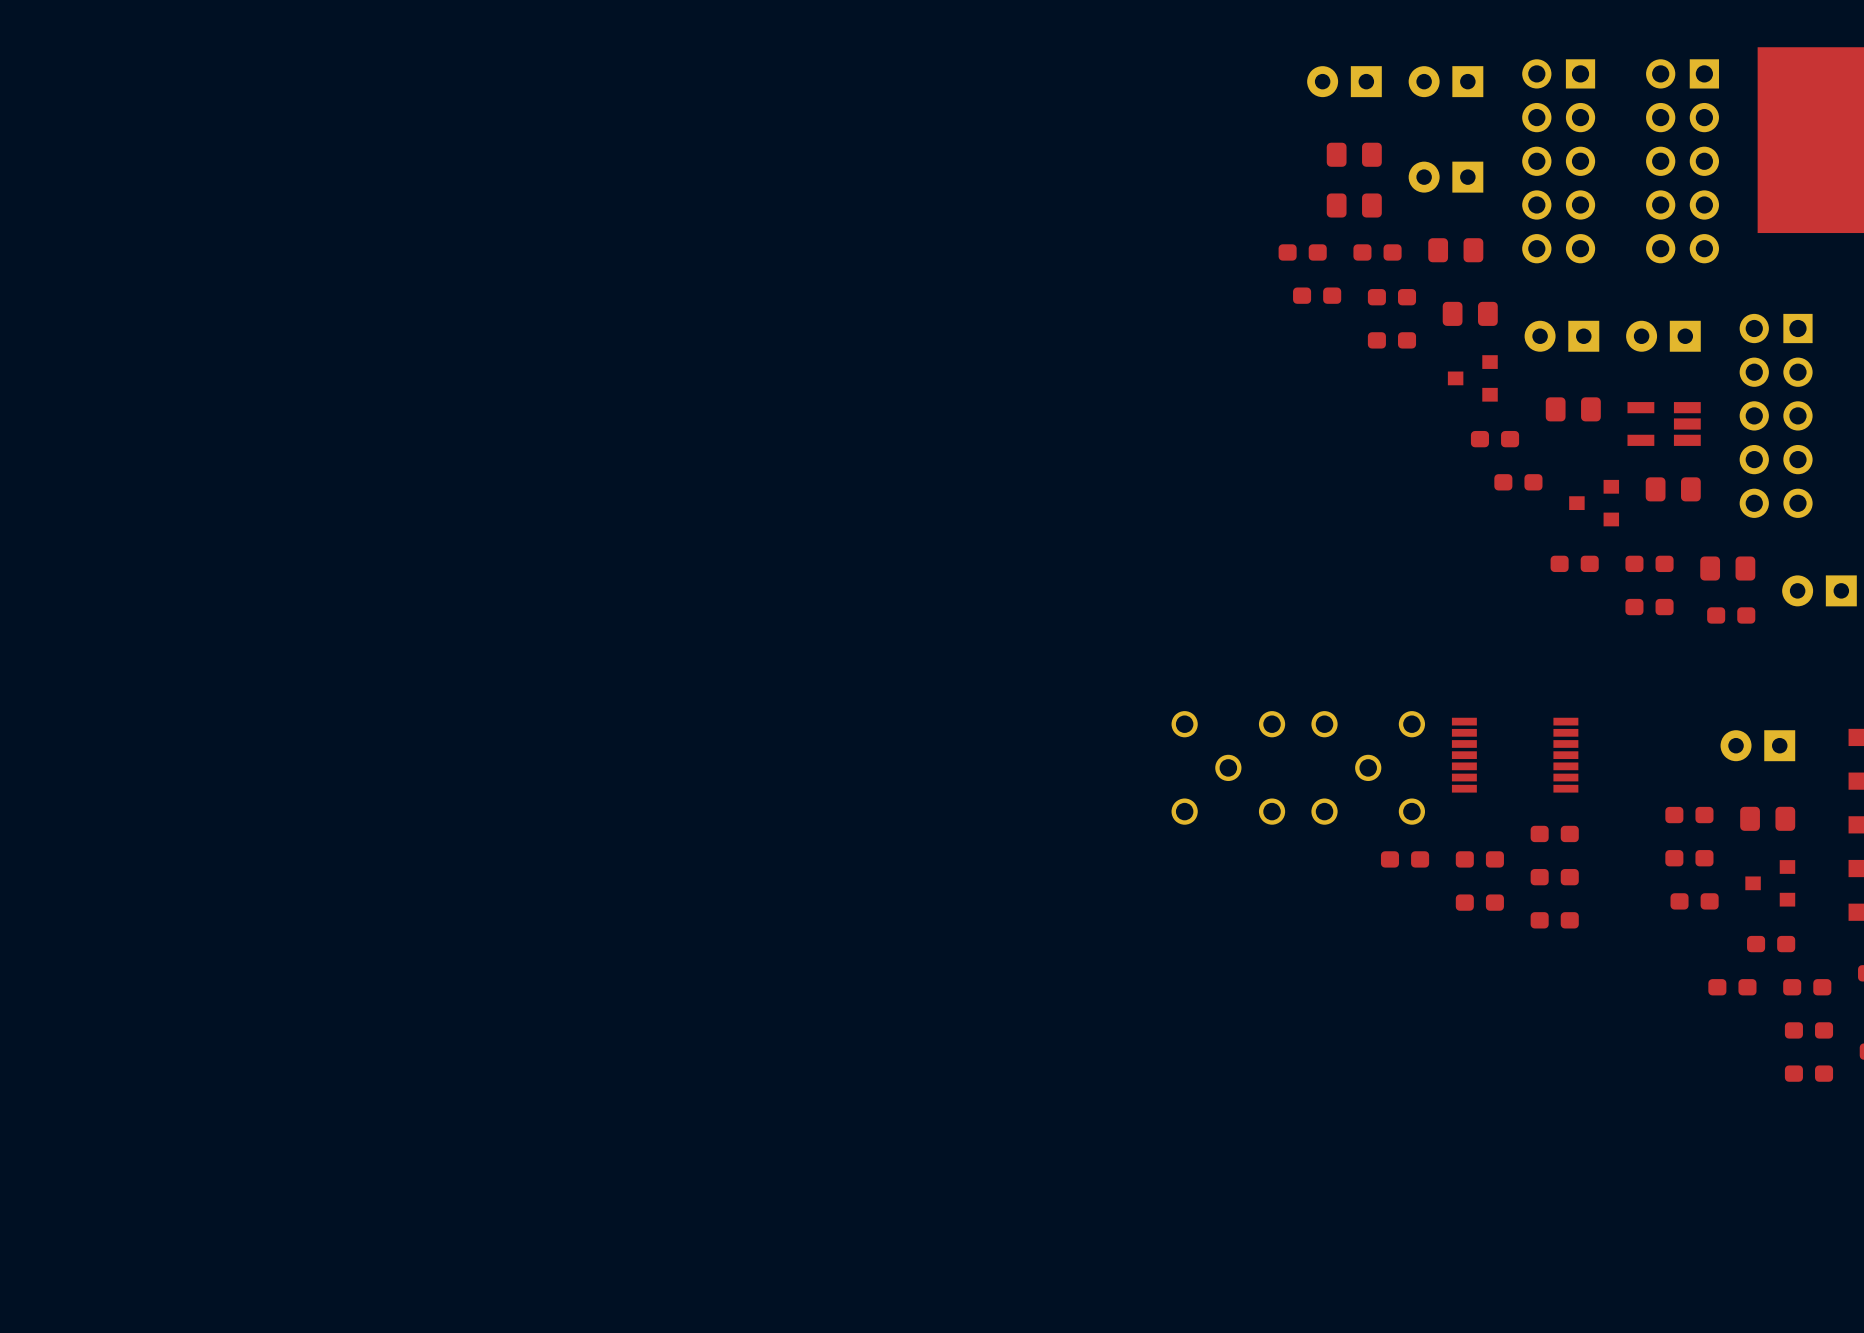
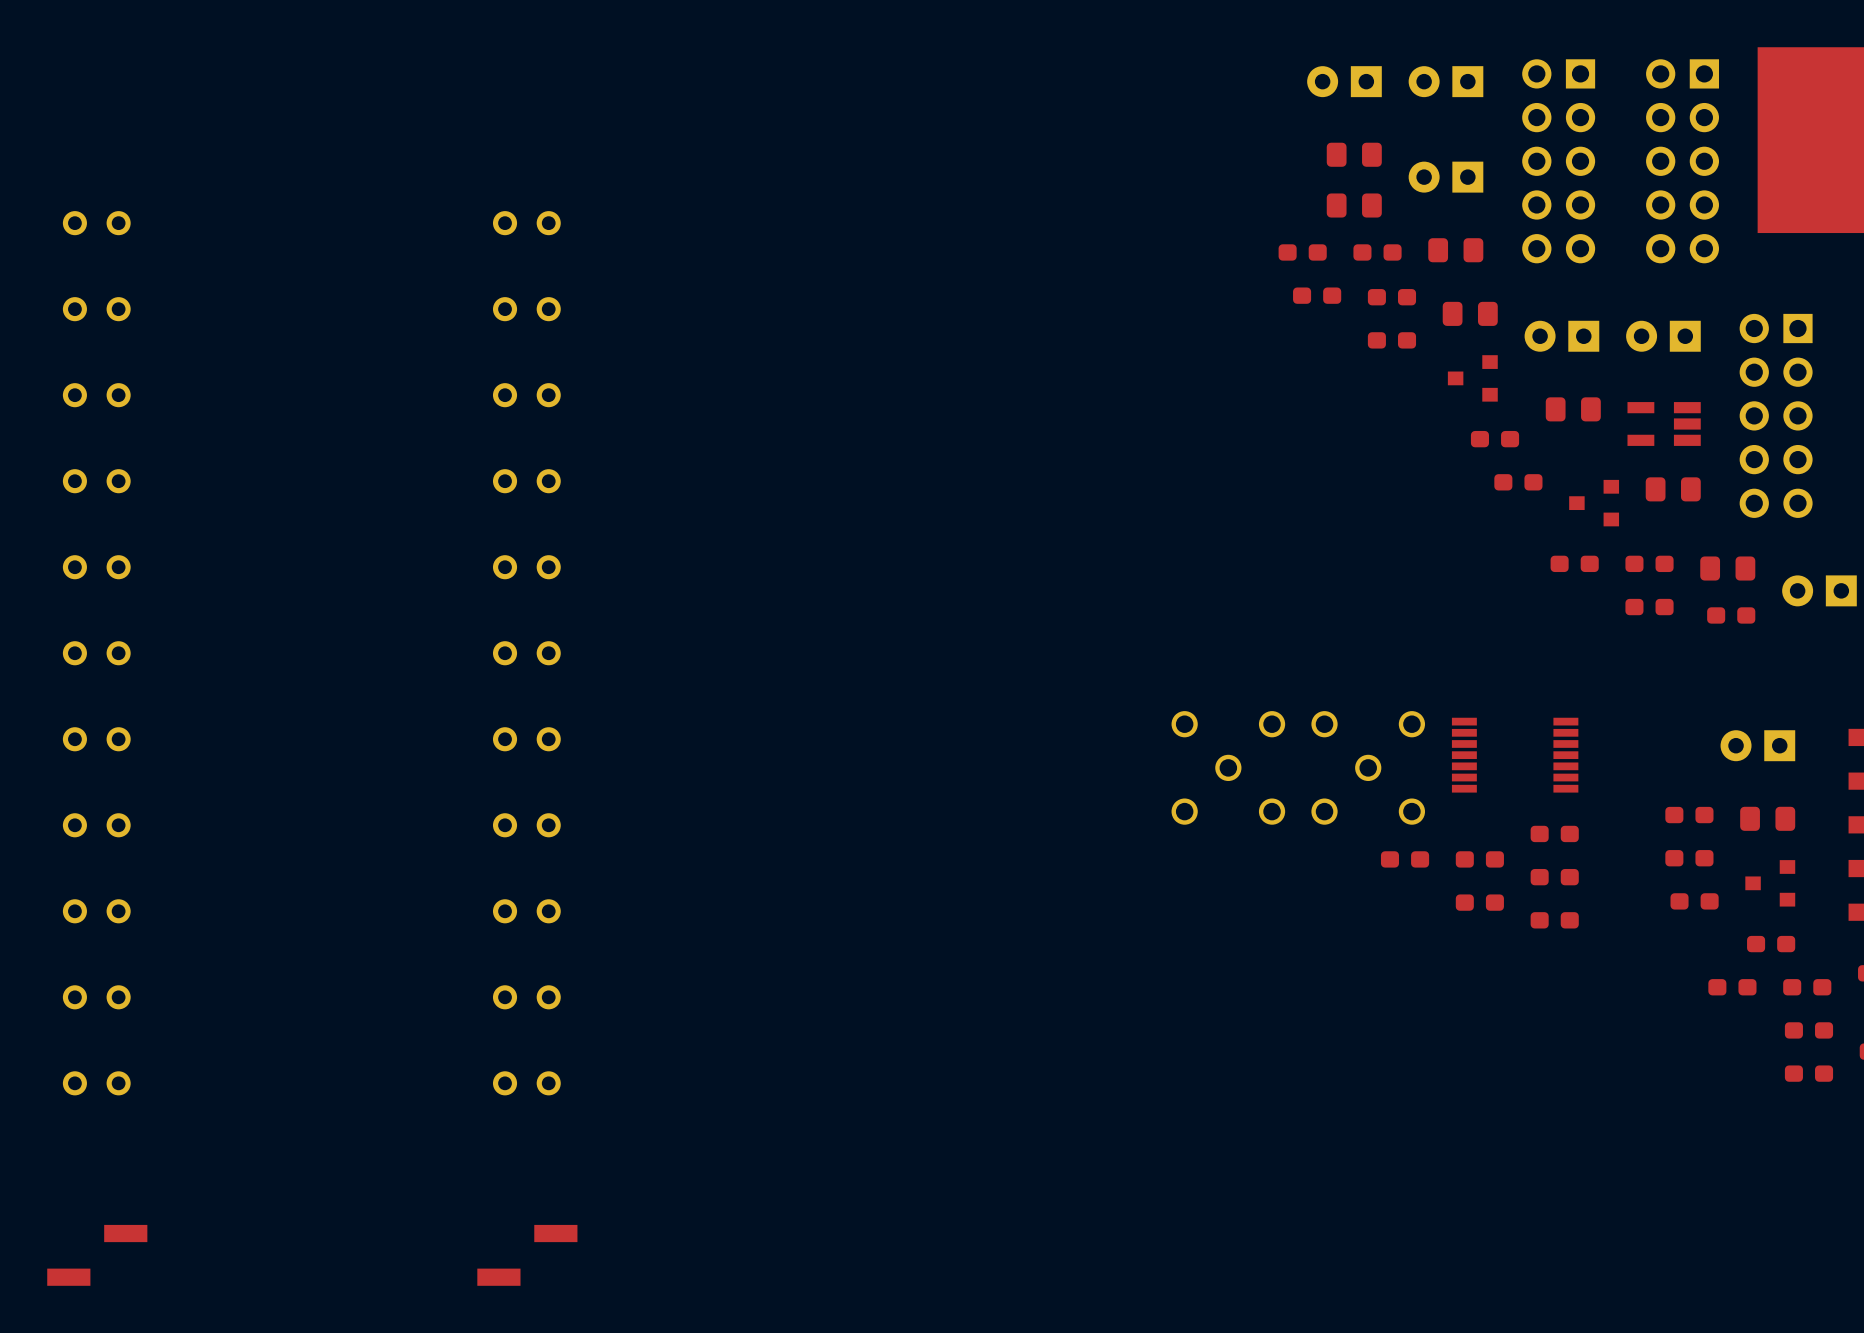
part: none -> (96, 223)
part: none -> (526, 223)
part: none -> (96, 309)
part: none -> (526, 309)
part: none -> (96, 395)
part: none -> (526, 395)
part: none -> (96, 481)
part: none -> (526, 481)
part: none -> (96, 567)
part: none -> (526, 567)
part: none -> (96, 653)
part: none -> (526, 653)
part: none -> (96, 739)
part: none -> (526, 739)
part: none -> (96, 825)
part: none -> (526, 825)
part: none -> (96, 911)
part: none -> (526, 911)
part: none -> (96, 997)
part: none -> (526, 997)
part: none -> (96, 1083)
part: none -> (526, 1083)
part: none -> (97, 1255)
part: none -> (527, 1255)

